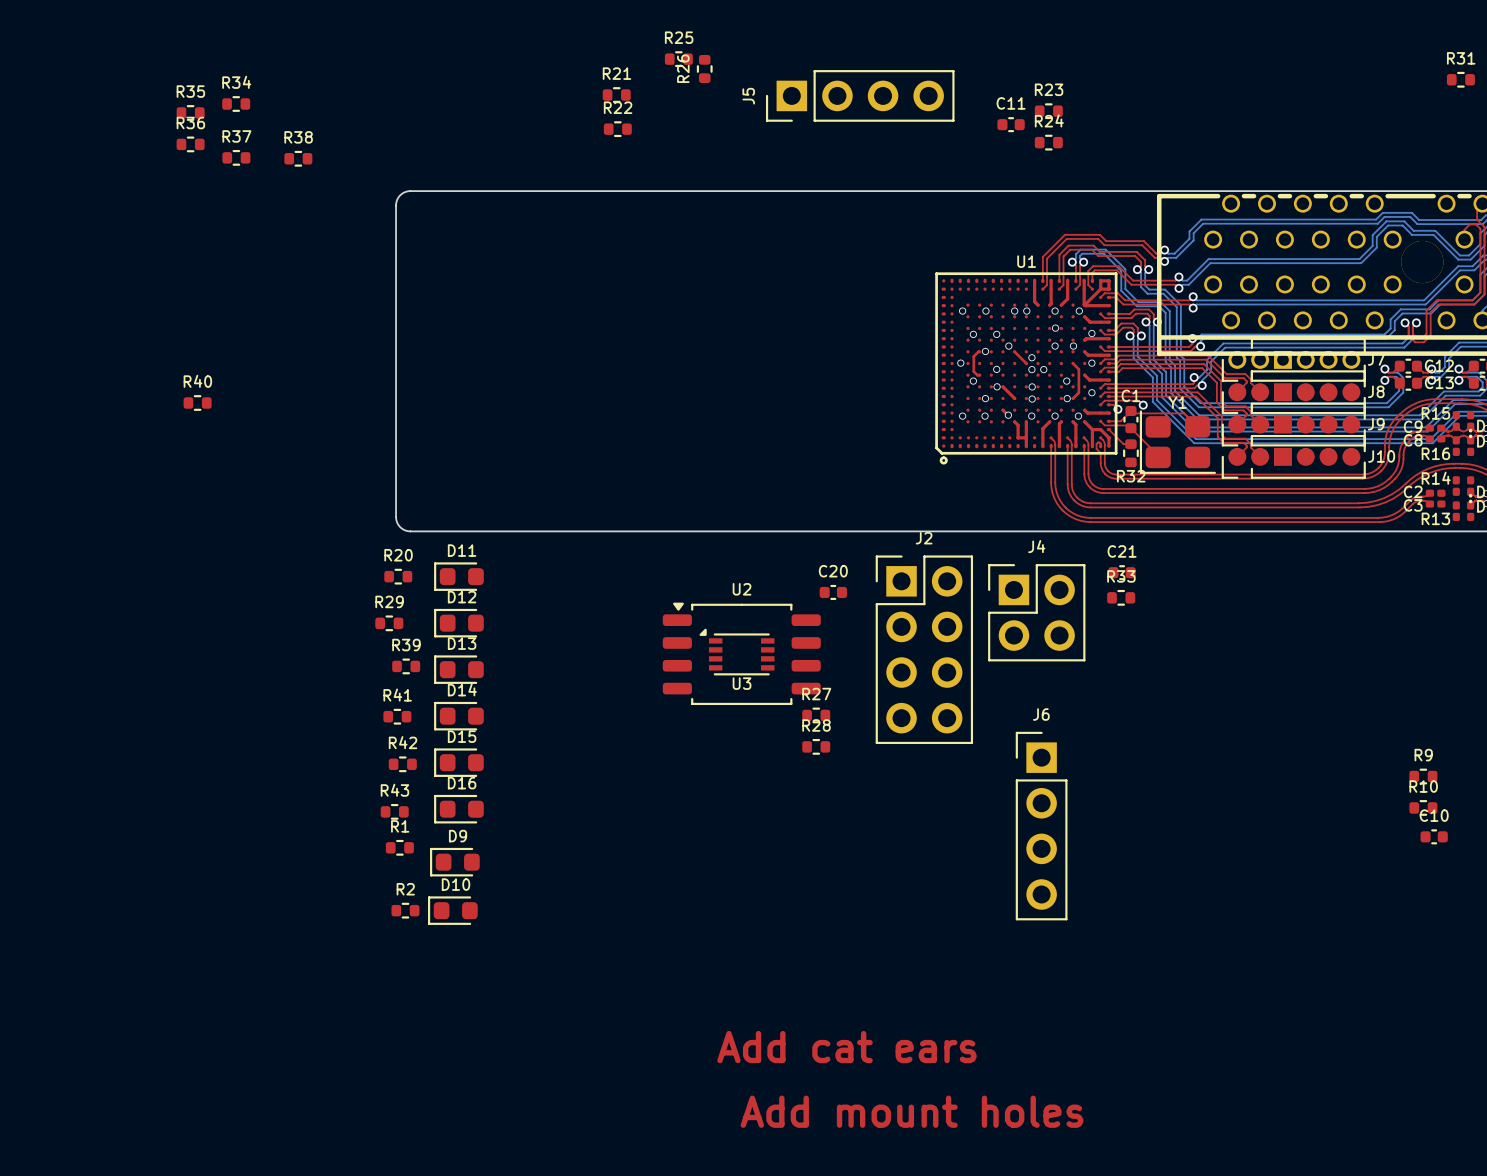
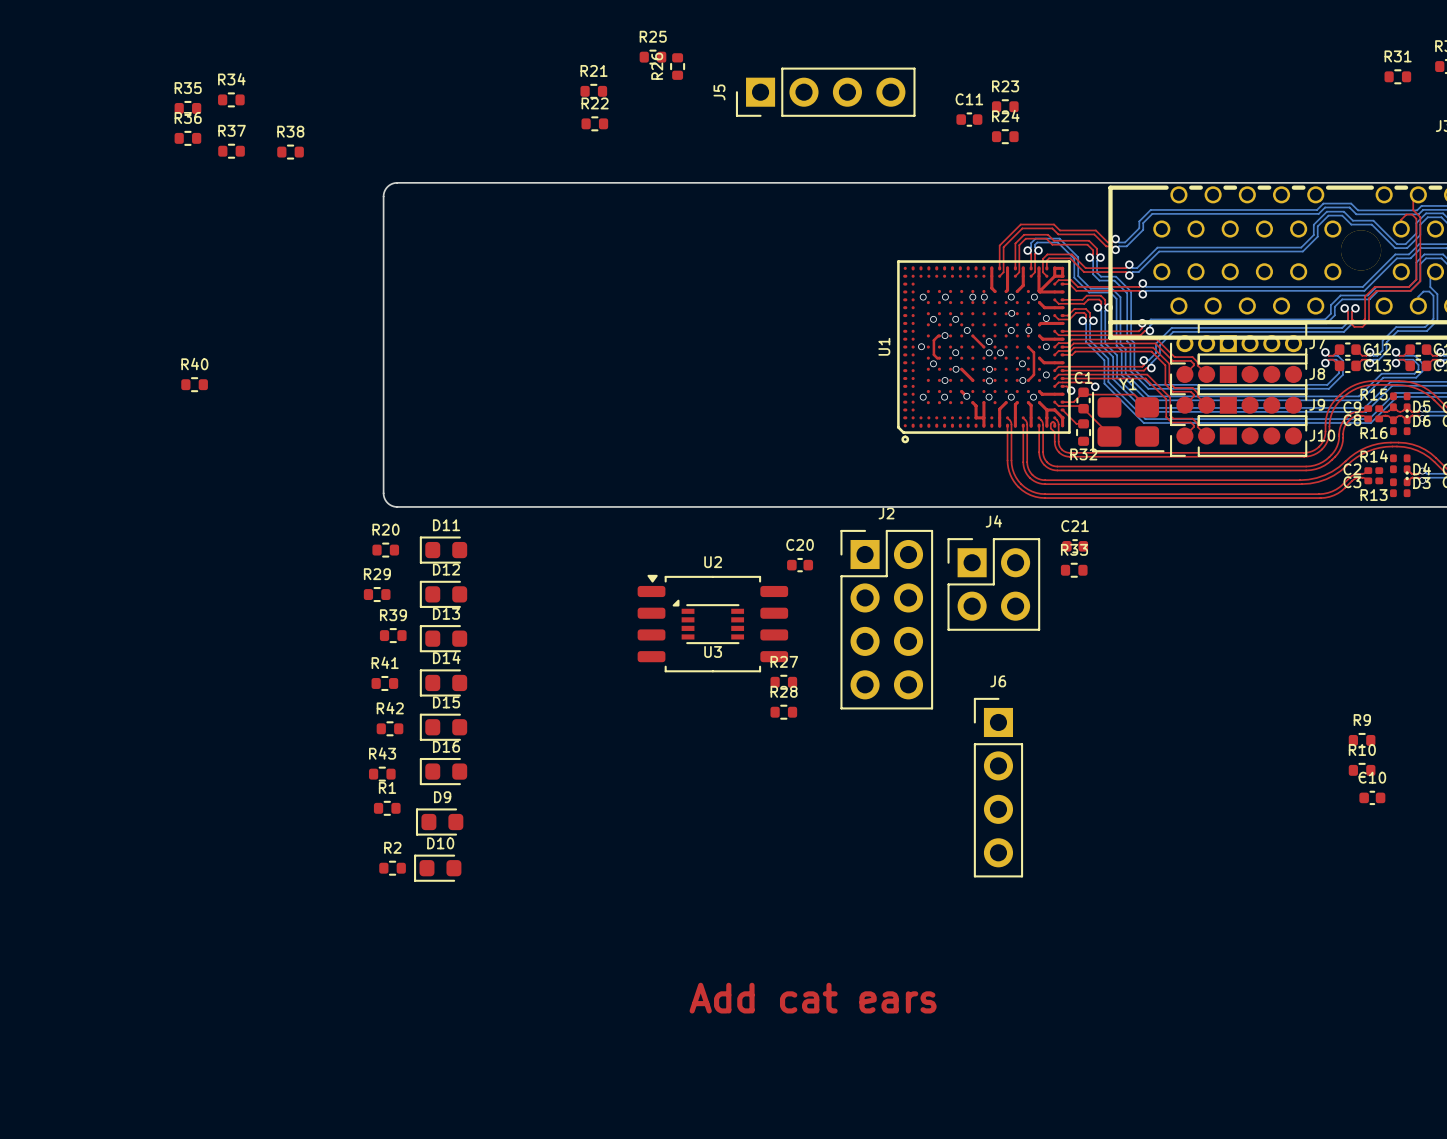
U1 name rotation: 0° (1026, 261) -> 90° counterclockwise (884, 346)
U1 name position: U1 (1026, 261) -> U1 (884, 346)
text: Add mount holes (912, 1111) -> none

